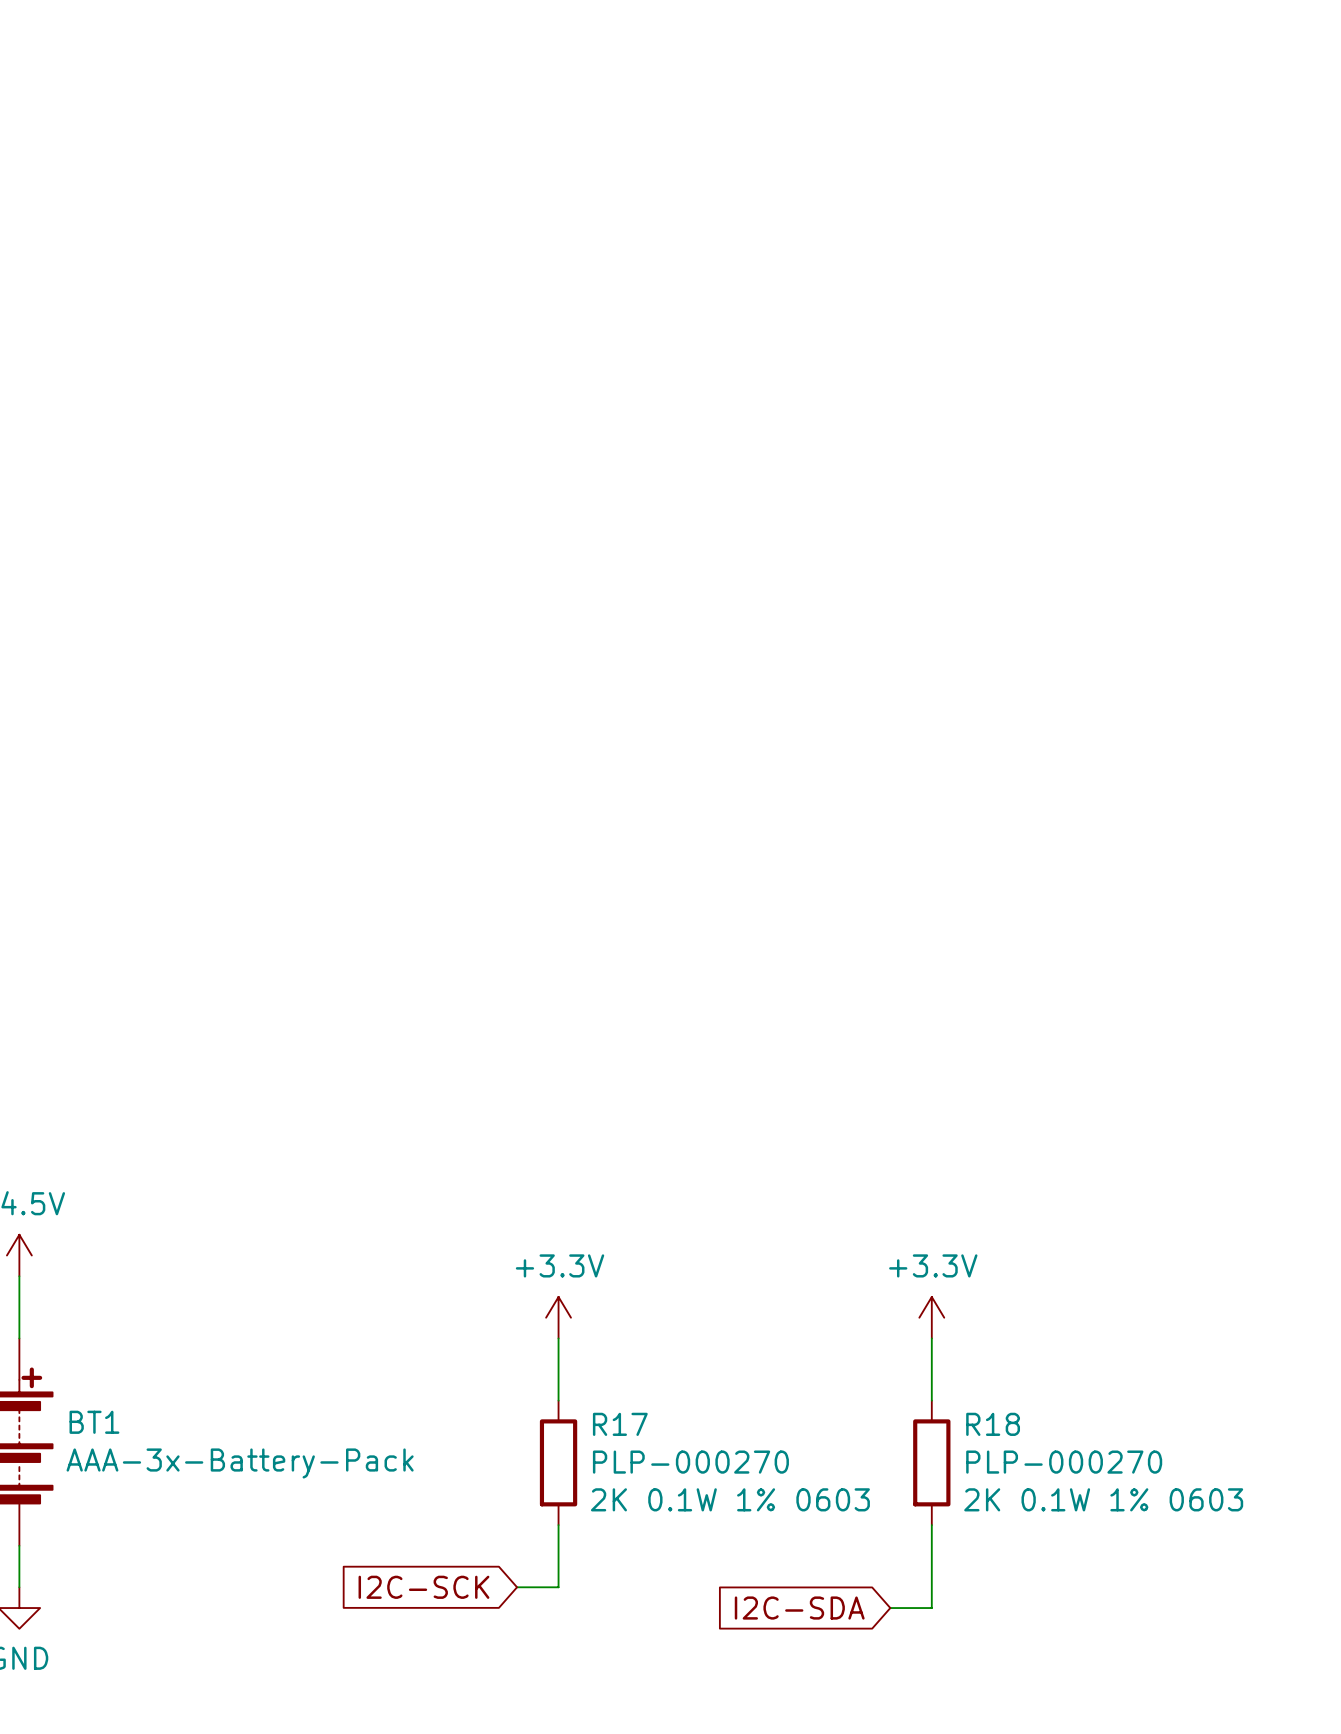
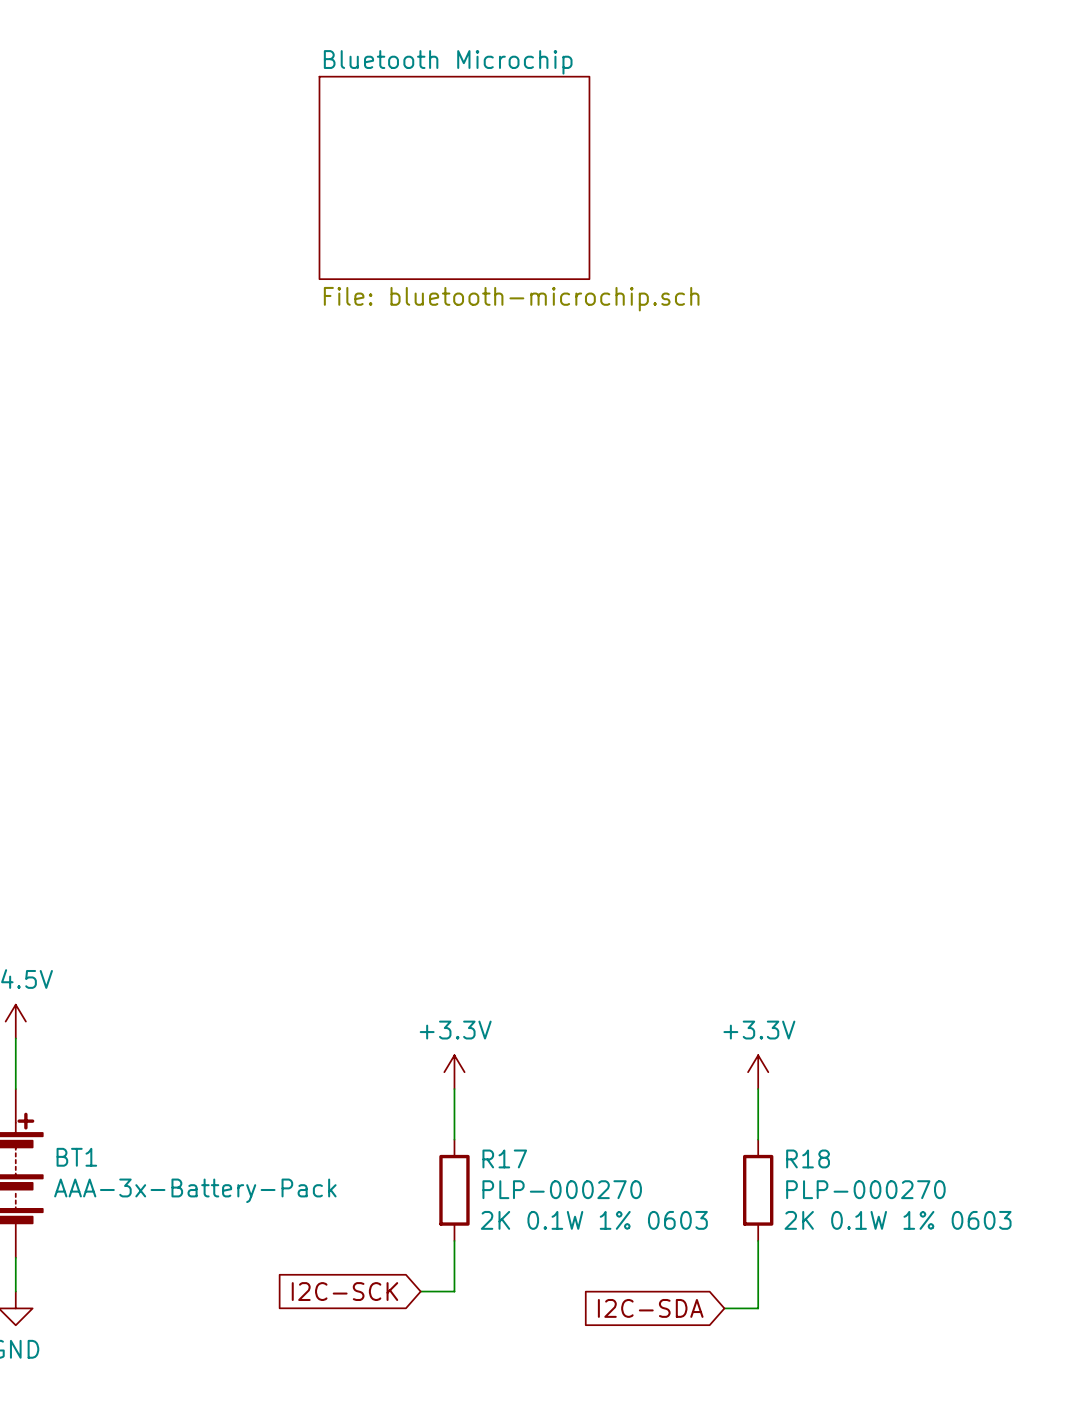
sheet Bluetooth Microchip: none -> File: bluetooth-microchip.sch (454, 177)

